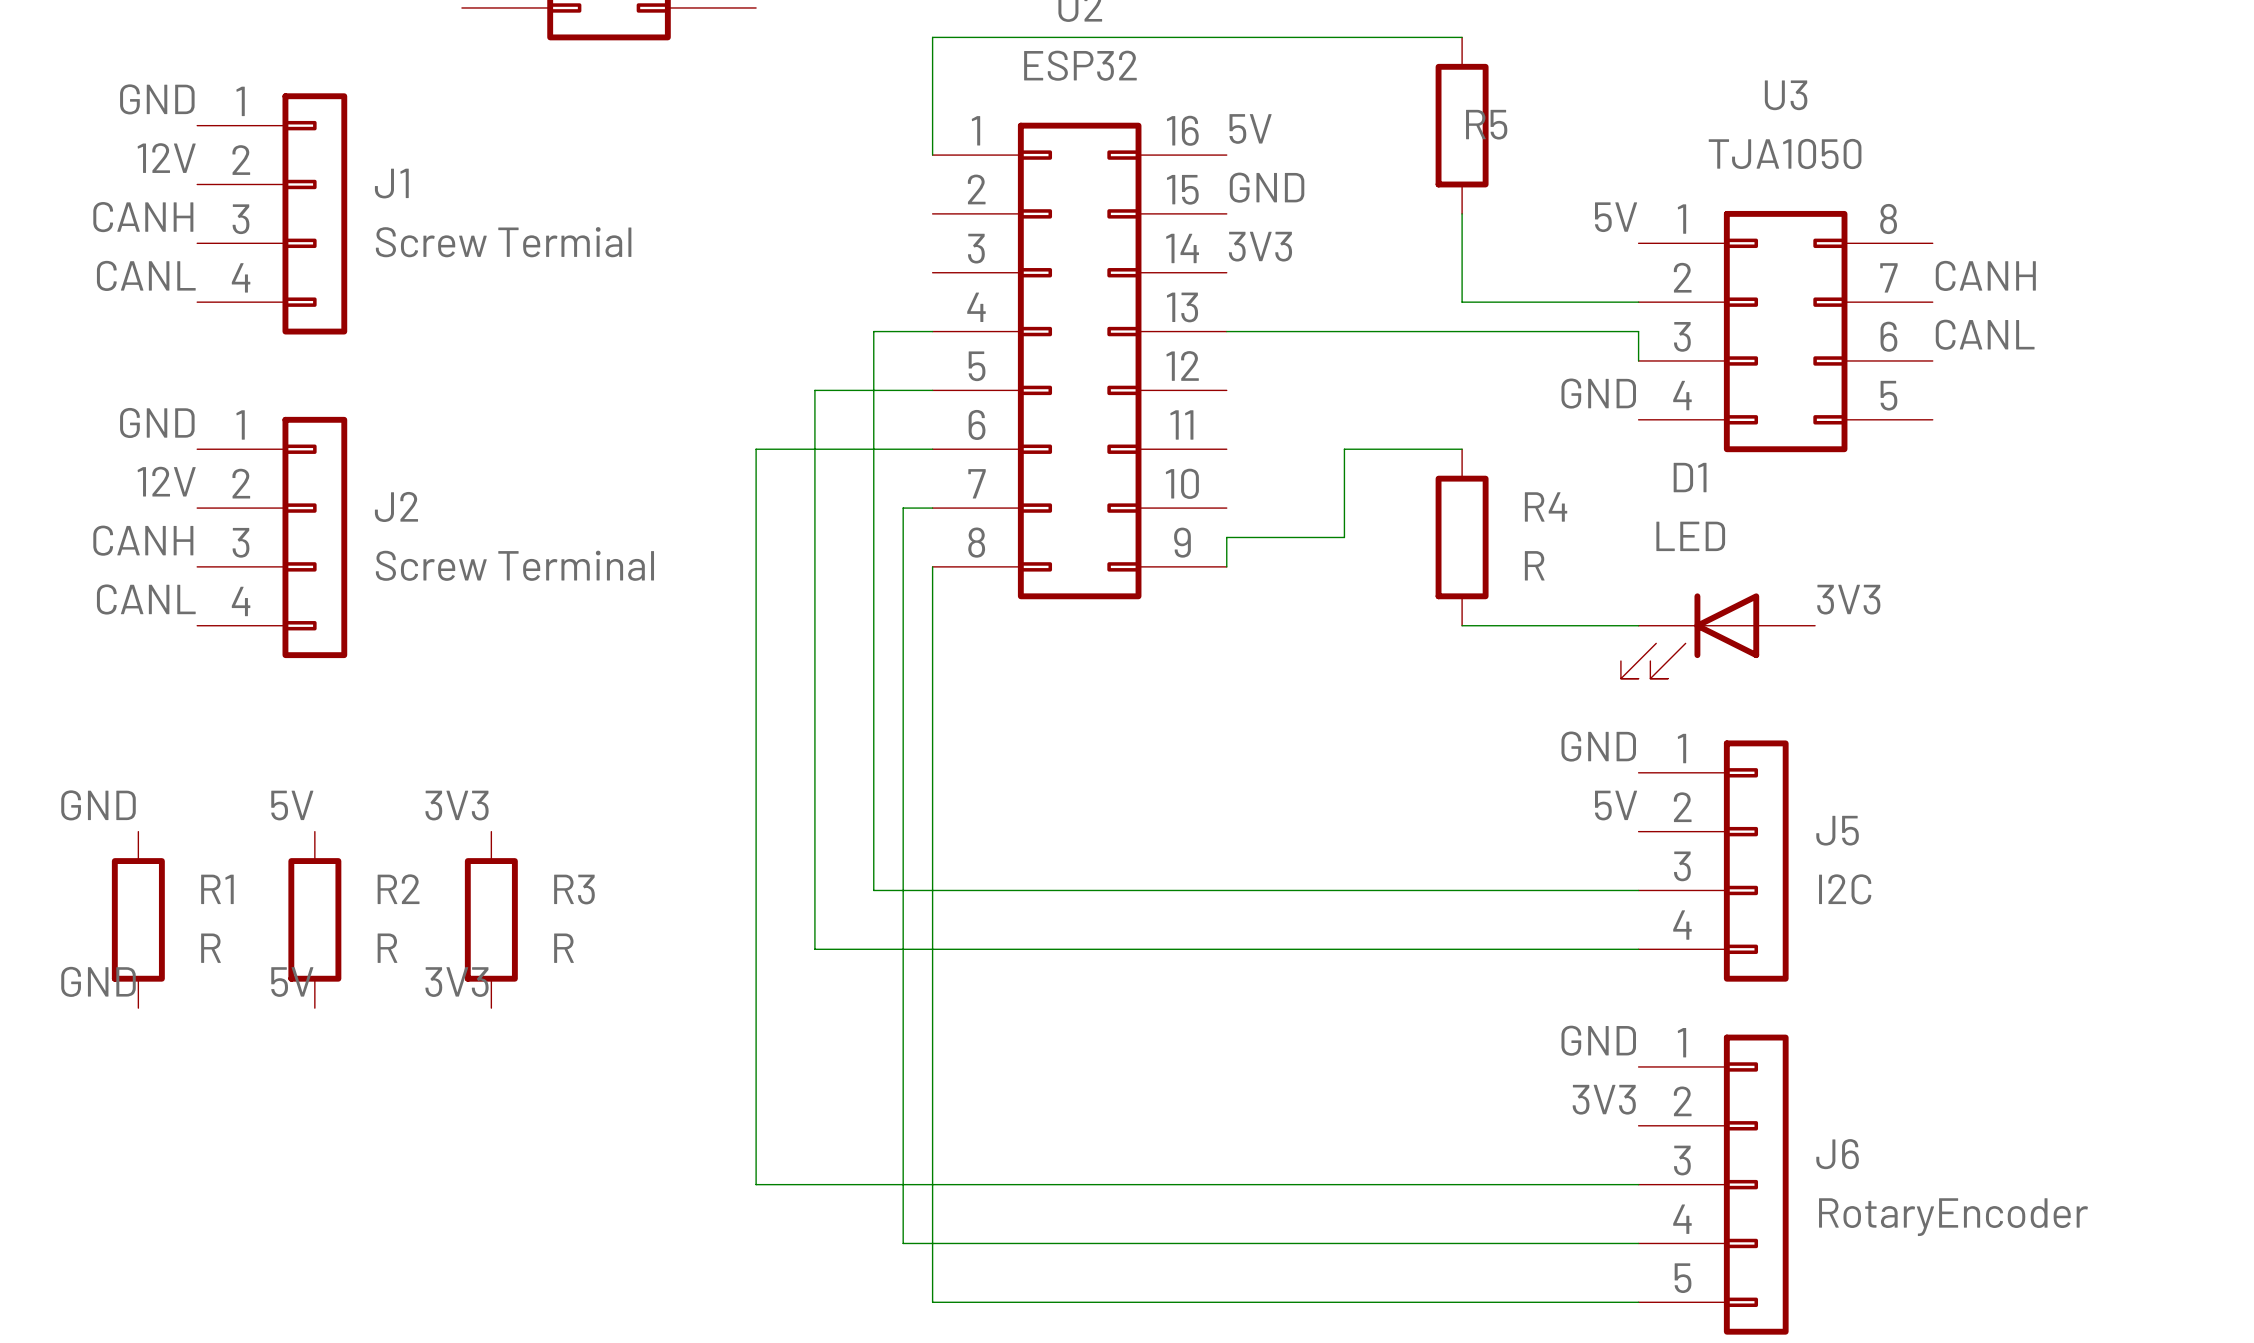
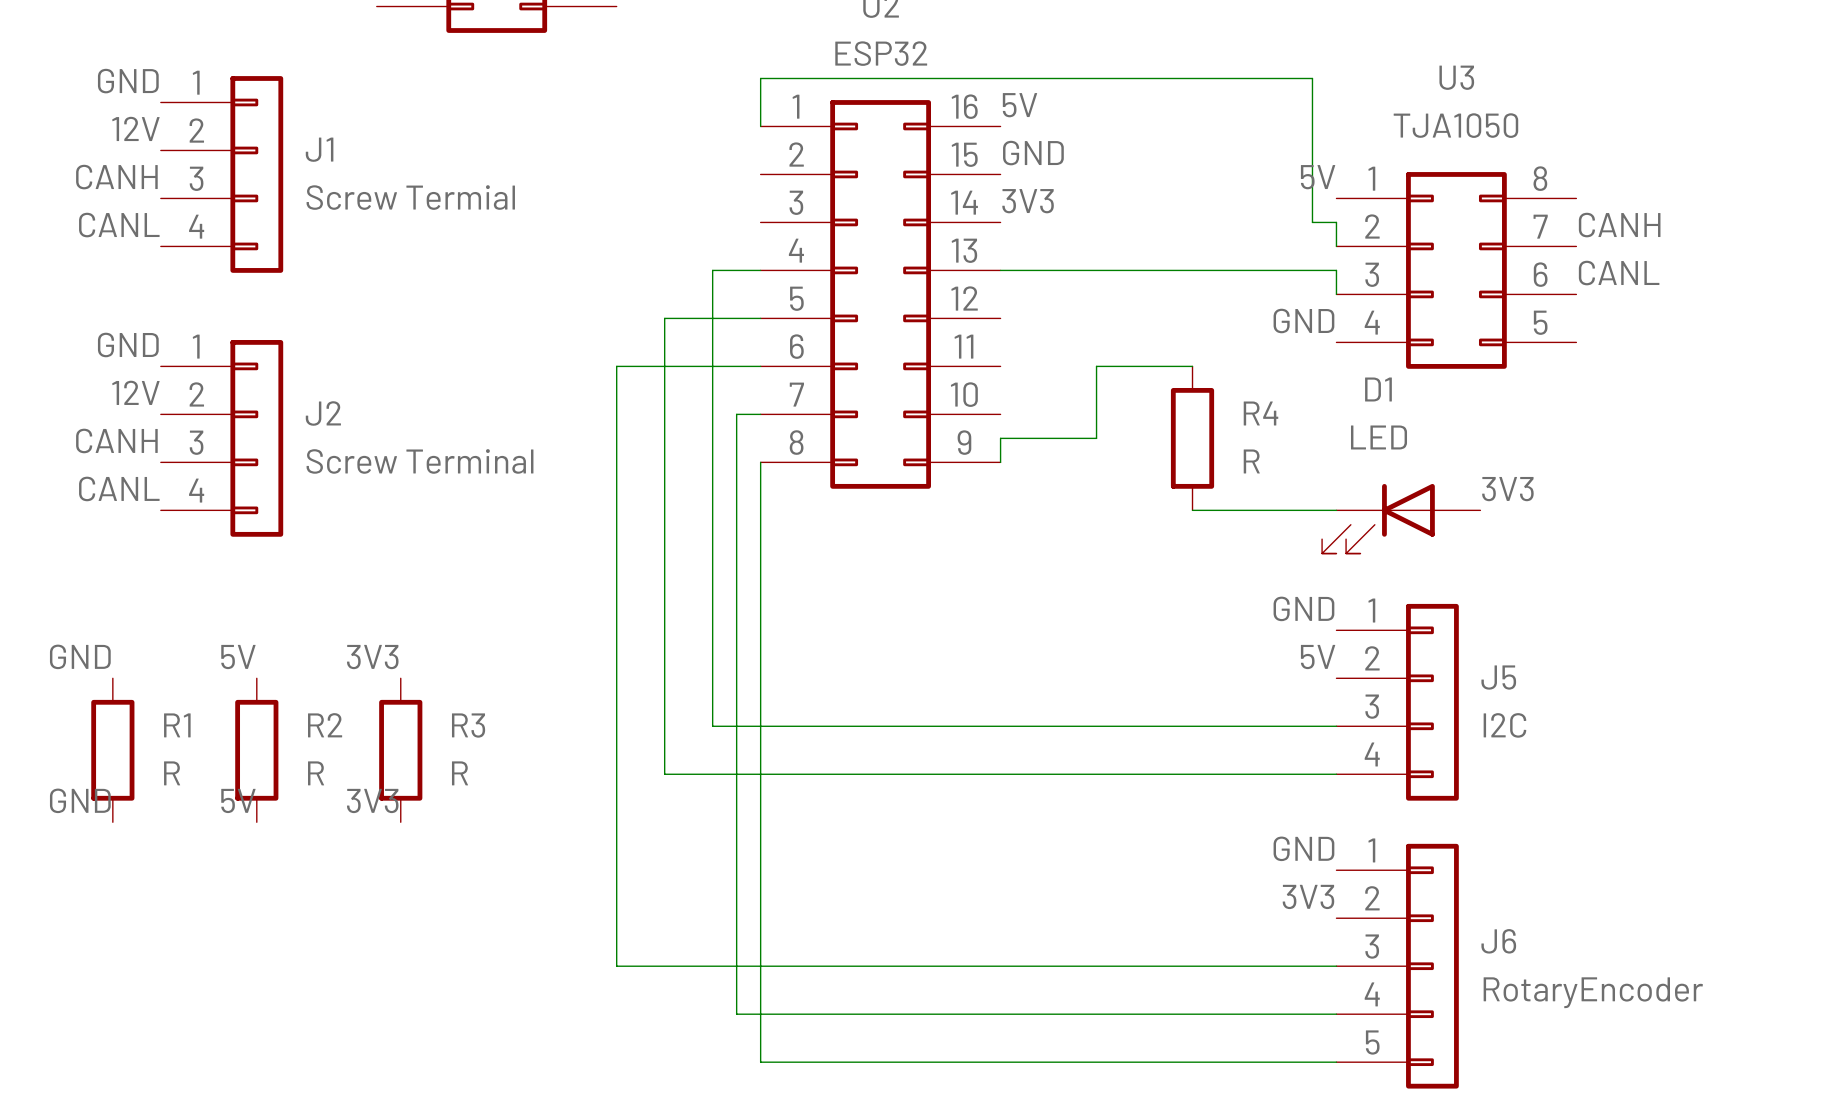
wire: (1462, 37) (932, 37) (932, 96) -> (1336, 246) (1336, 222) (1312, 222) (1312, 78) (760, 78)
R5: (1462, 125) -> none
wire: (1462, 213) (1462, 302) (1638, 302) -> none

